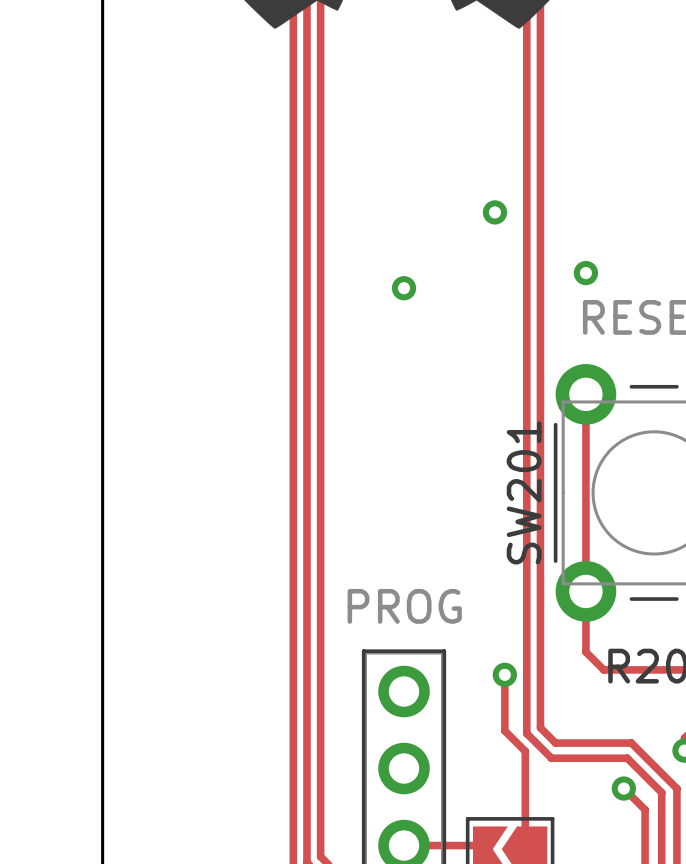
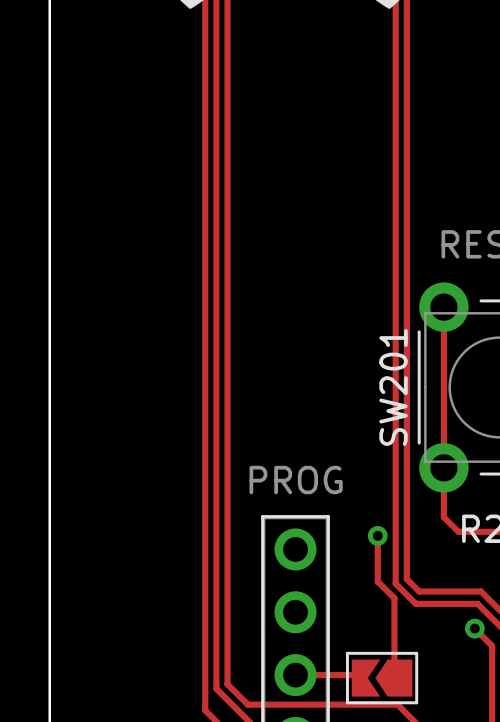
via: (494, 212) -> none
via: (585, 273) -> none
via: (404, 288) -> none

